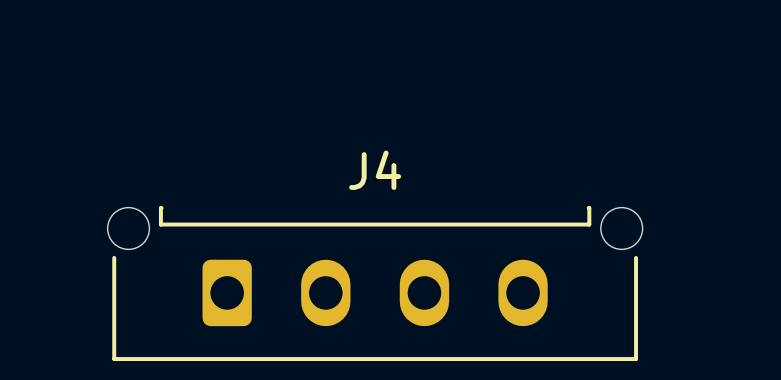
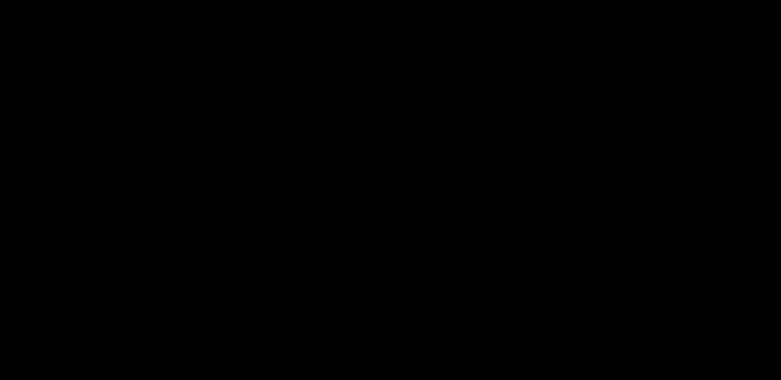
J4: (375, 283) -> none

